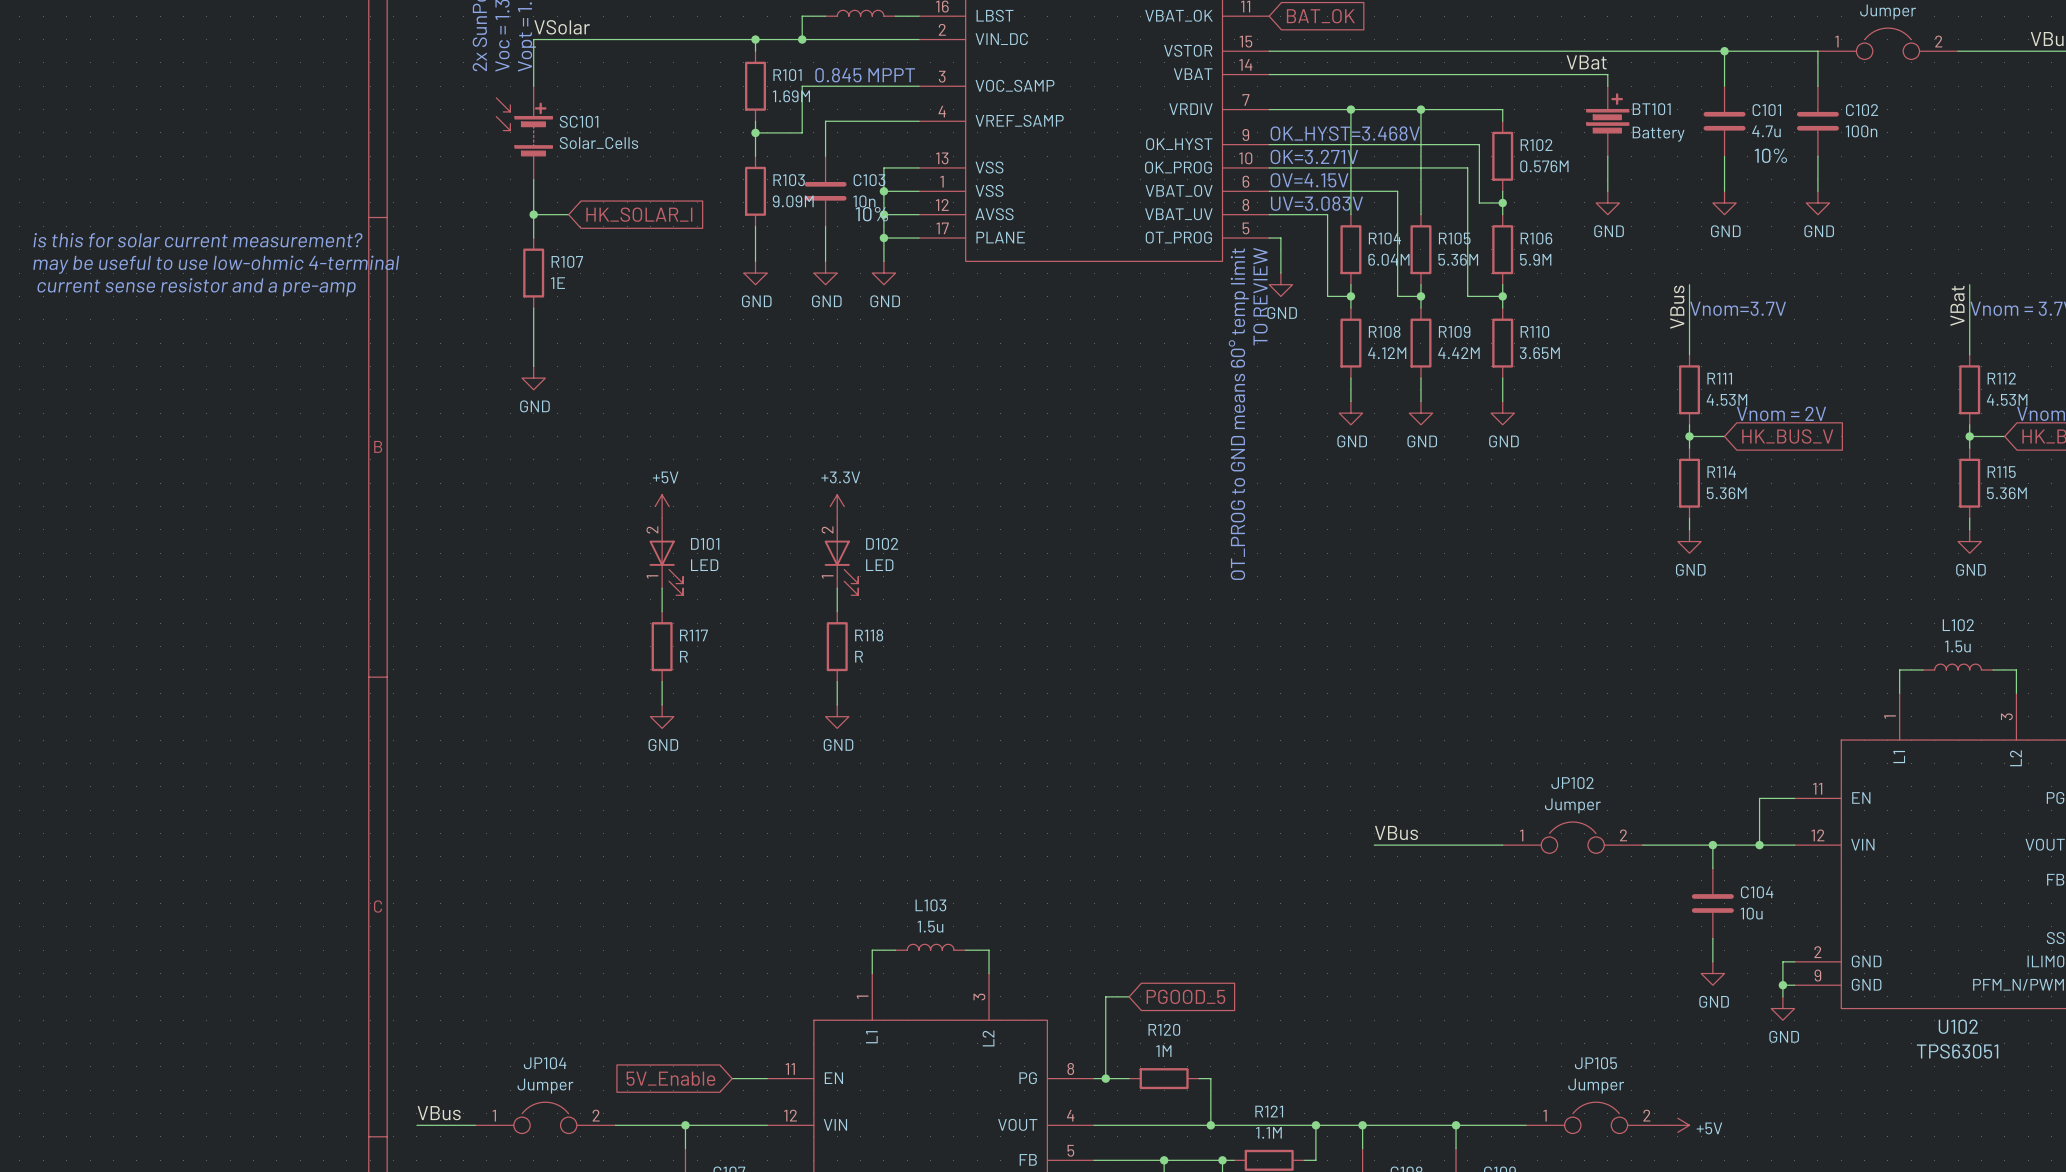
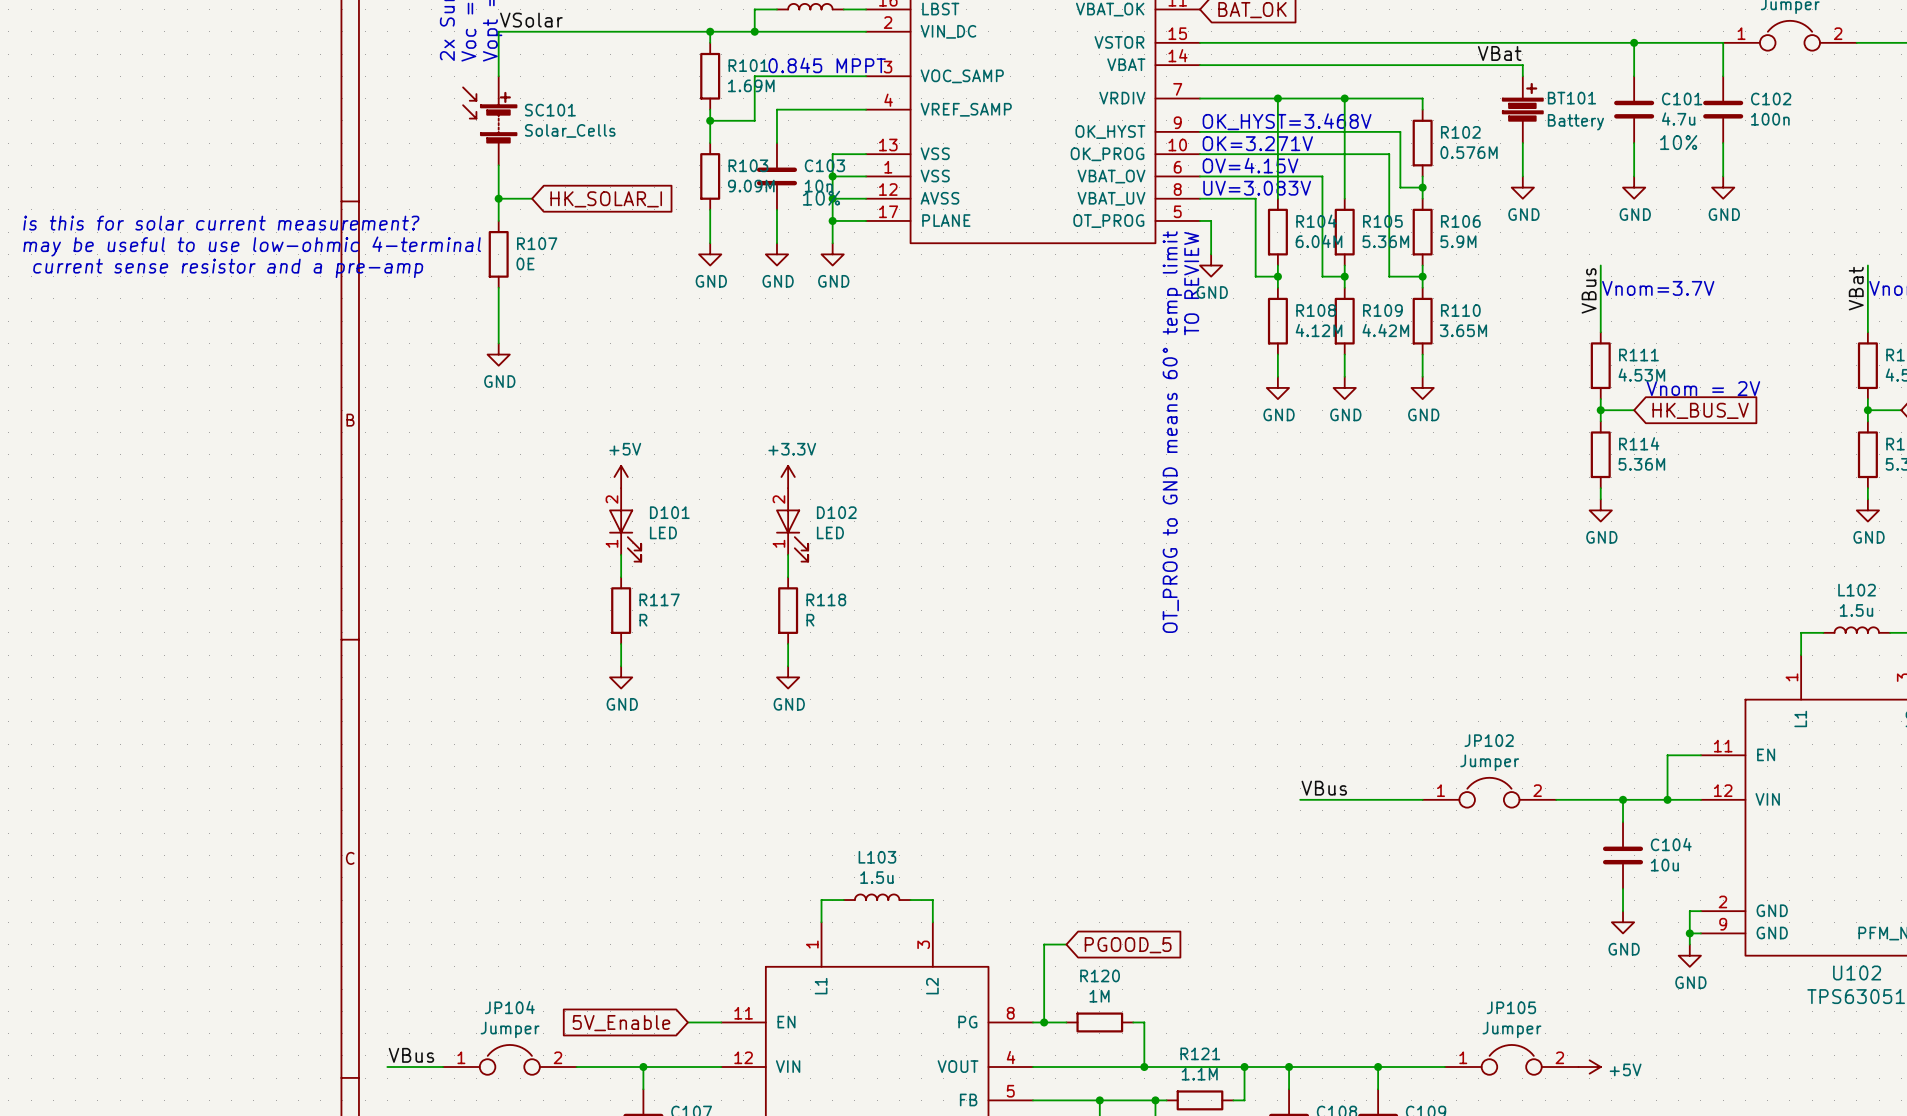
R107 value: 1E (558, 283) -> 0E (525, 263)

